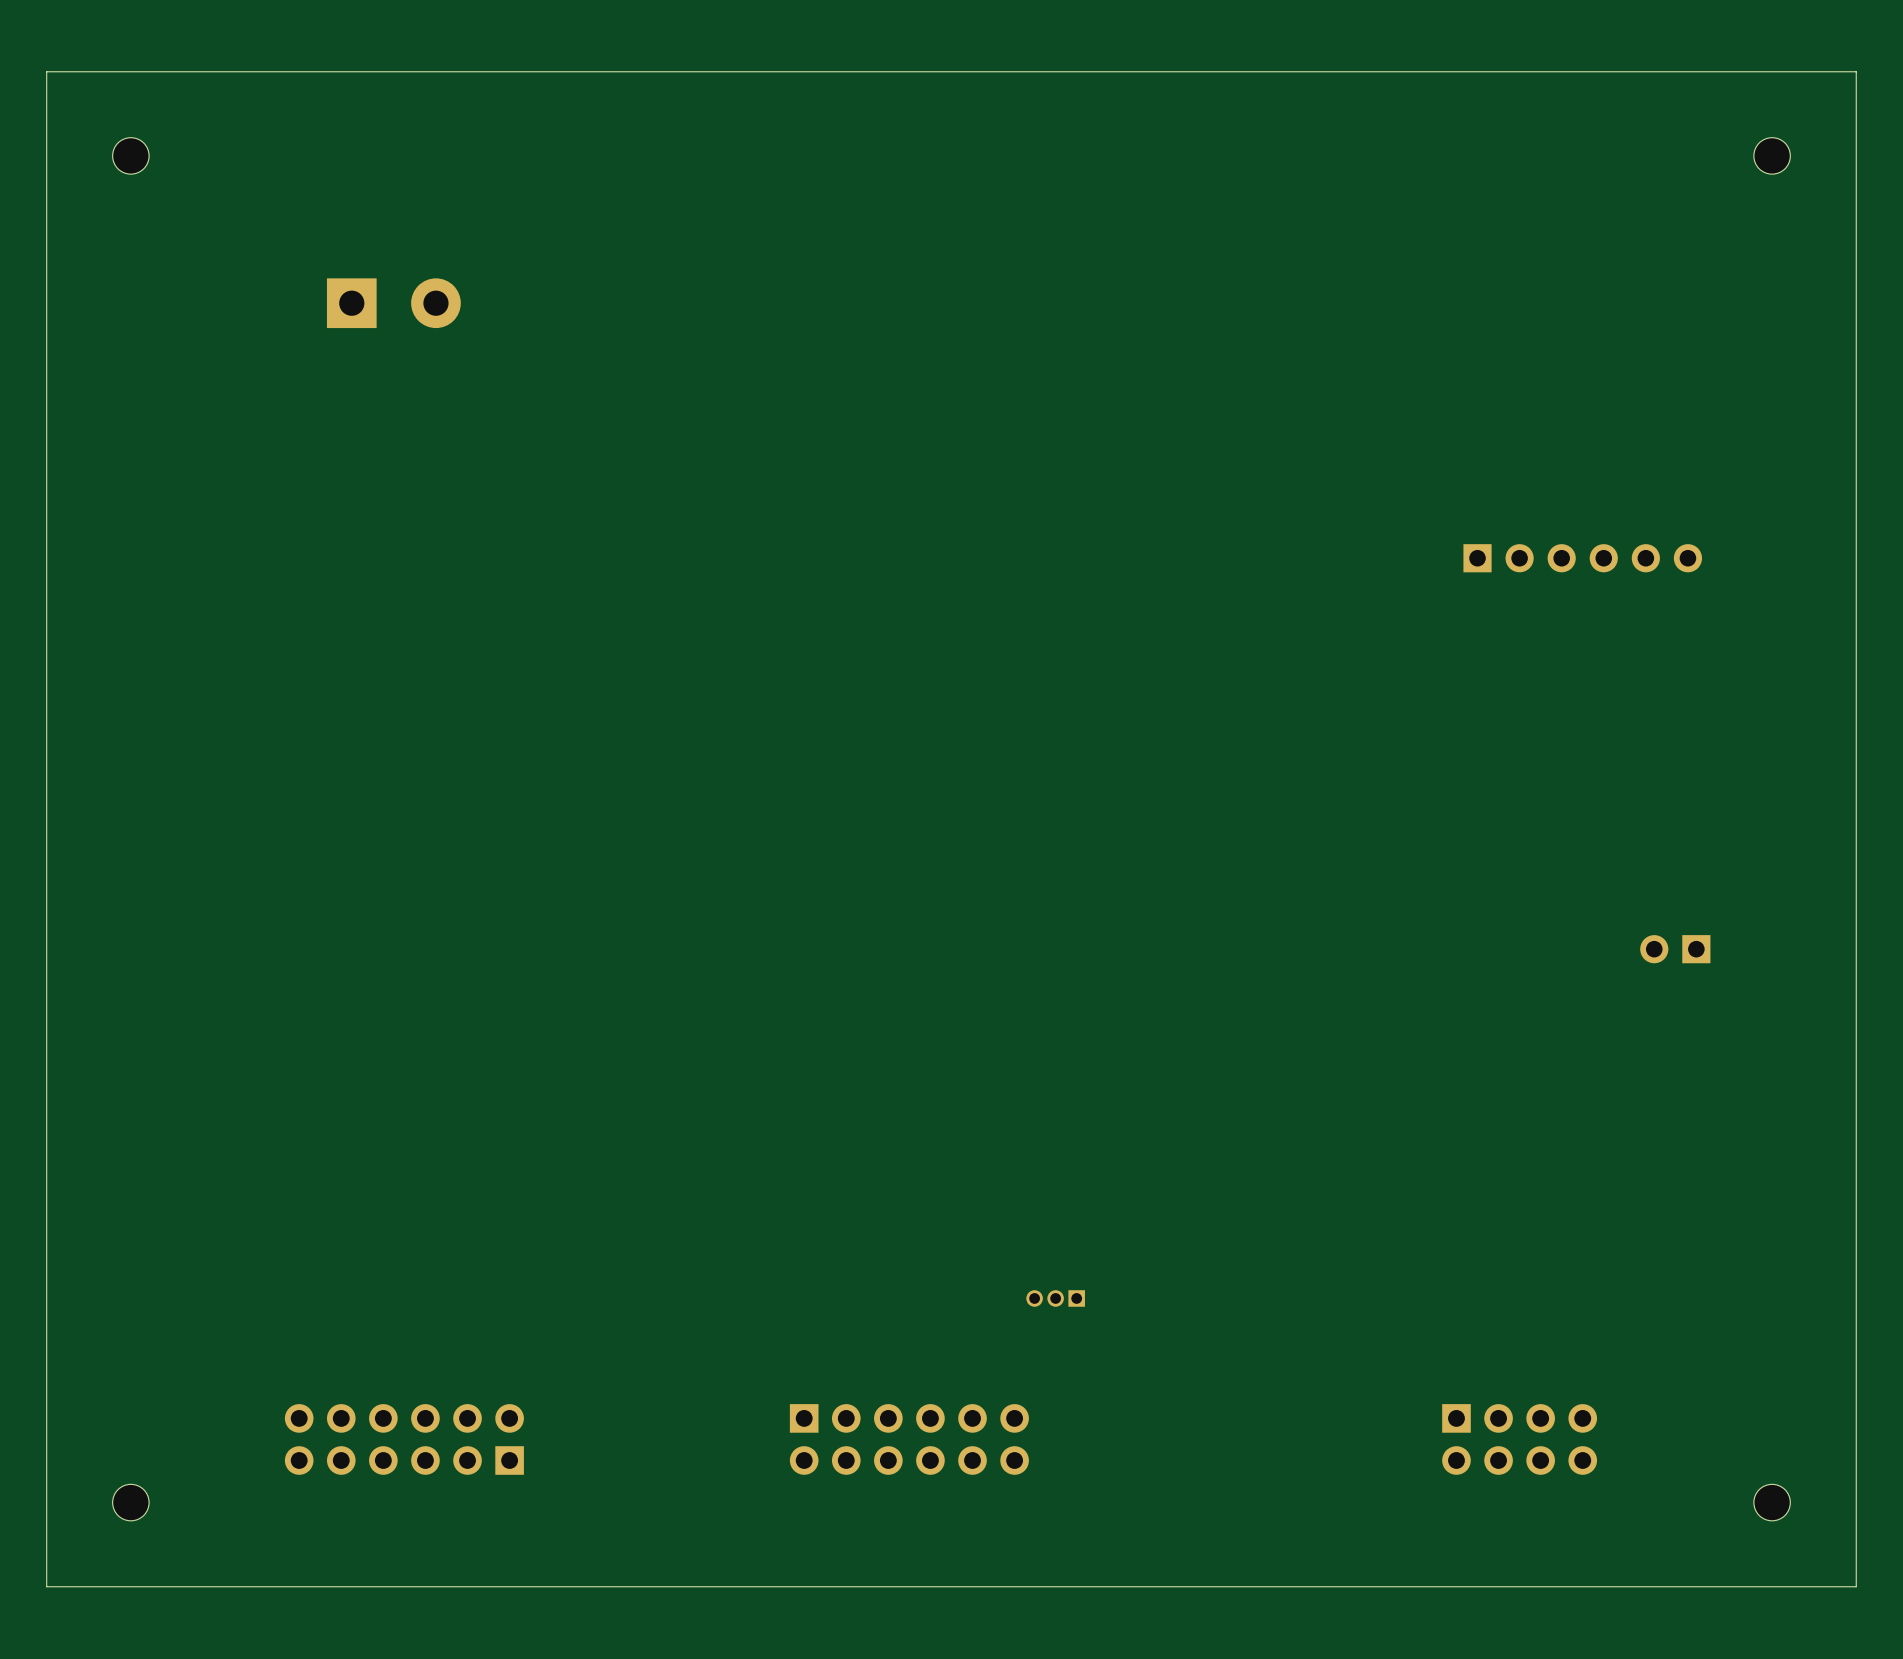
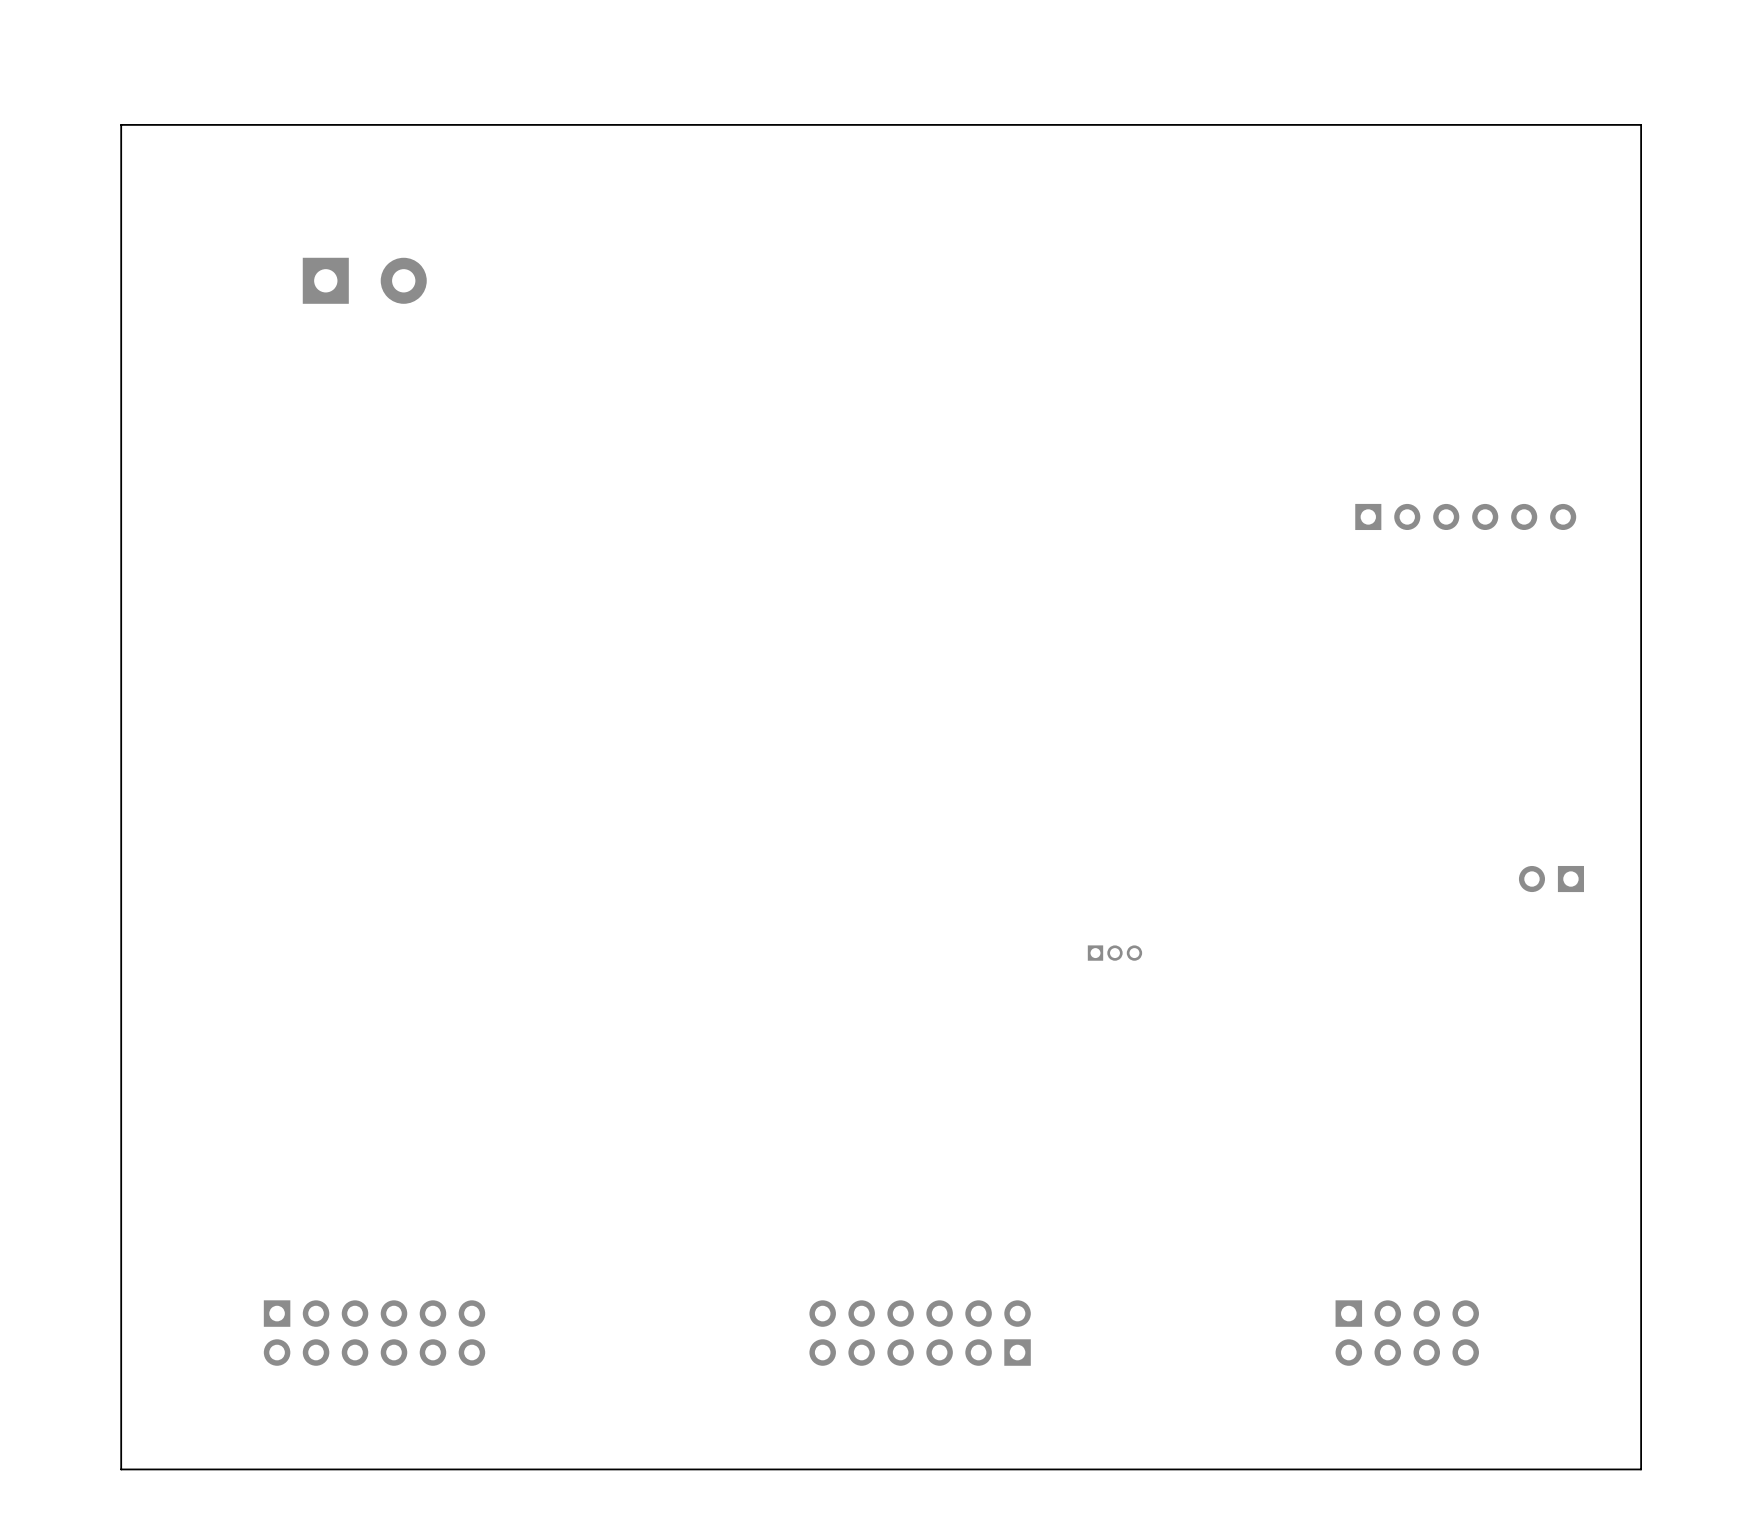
part: (130, 155) -> none
part: (1772, 155) -> none
part rotation: 0° (1055, 1298) -> 180° (1114, 953)
part position: (1055, 1298) -> (1114, 953)
part rotation: 0° (404, 1439) -> 180° (374, 1333)
part rotation: 0° (909, 1439) -> 180° (920, 1333)
part: (130, 1502) -> none
part: (1772, 1502) -> none
board edge: (1772, 1586) (1856, 1586) (1856, 71) (46, 71) (46, 1586) (130, 1586) -> (1641, 1469) (1641, 124) (121, 124) (121, 1469)

